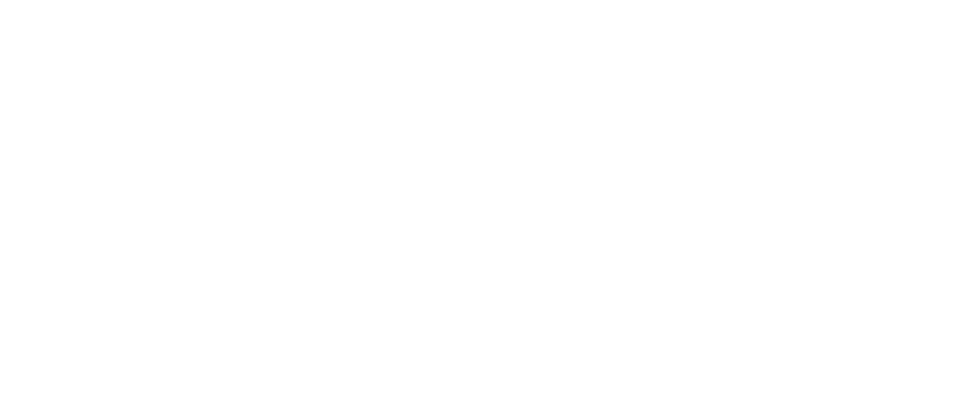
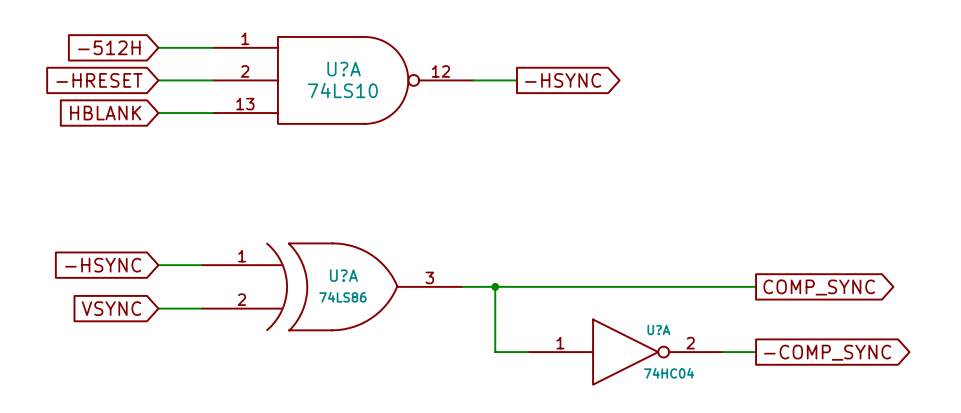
global label: none -> -512H (109, 47)
wire: none -> (158, 47) (212, 47)
global label: none -> -HRESET (99, 80)
wire: none -> (158, 80) (212, 80)
U?A: none -> 74LS10 (343, 80)
wire: none -> (473, 80) (517, 80)
global label: none -> -HSYNC (563, 80)
global label: none -> HBLANK (105, 113)
wire: none -> (158, 113) (212, 113)
global label: none -> -HSYNC (103, 265)
wire: none -> (158, 265) (201, 265)
wire: none -> (462, 286) (756, 286)
wire: none -> (495, 286) (495, 352) (527, 352)
junction: none -> (495, 286)
U?A: none -> 74LS86 (332, 287)
global label: none -> COMP_SYNC (819, 287)
global label: none -> VSYNC (111, 308)
wire: none -> (158, 308) (201, 308)
U?A: none -> 74HC04 (625, 352)
wire: none -> (723, 352) (756, 352)
global label: none -> -COMP_SYNC (827, 352)

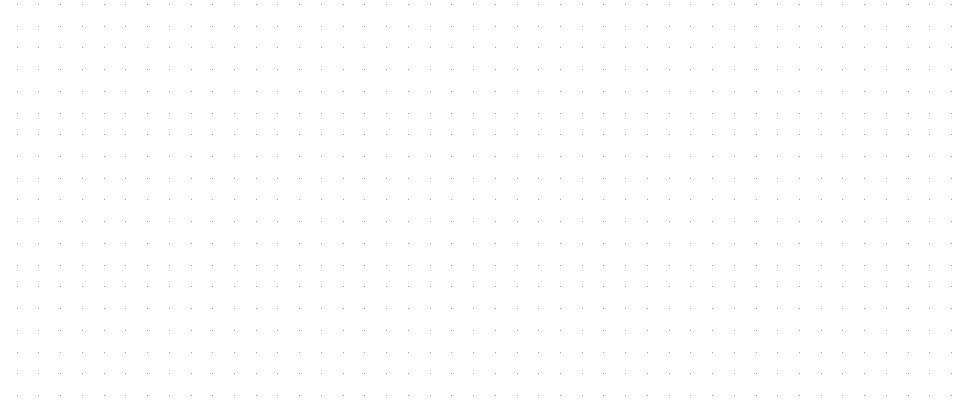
global label: -512H (109, 47) -> none
wire: (158, 47) (212, 47) -> none
global label: -HRESET (99, 80) -> none
wire: (158, 80) (212, 80) -> none
U?A: 74LS10 (343, 80) -> none
wire: (473, 80) (517, 80) -> none
global label: -HSYNC (563, 80) -> none
global label: HBLANK (105, 113) -> none
wire: (158, 113) (212, 113) -> none
global label: -HSYNC (103, 265) -> none
wire: (158, 265) (201, 265) -> none
wire: (462, 286) (756, 286) -> none
wire: (495, 286) (495, 352) (527, 352) -> none
junction: (495, 286) -> none
U?A: 74LS86 (332, 287) -> none
global label: COMP_SYNC (819, 287) -> none
global label: VSYNC (111, 308) -> none
wire: (158, 308) (201, 308) -> none
U?A: 74HC04 (625, 352) -> none
wire: (723, 352) (756, 352) -> none
global label: -COMP_SYNC (827, 352) -> none

